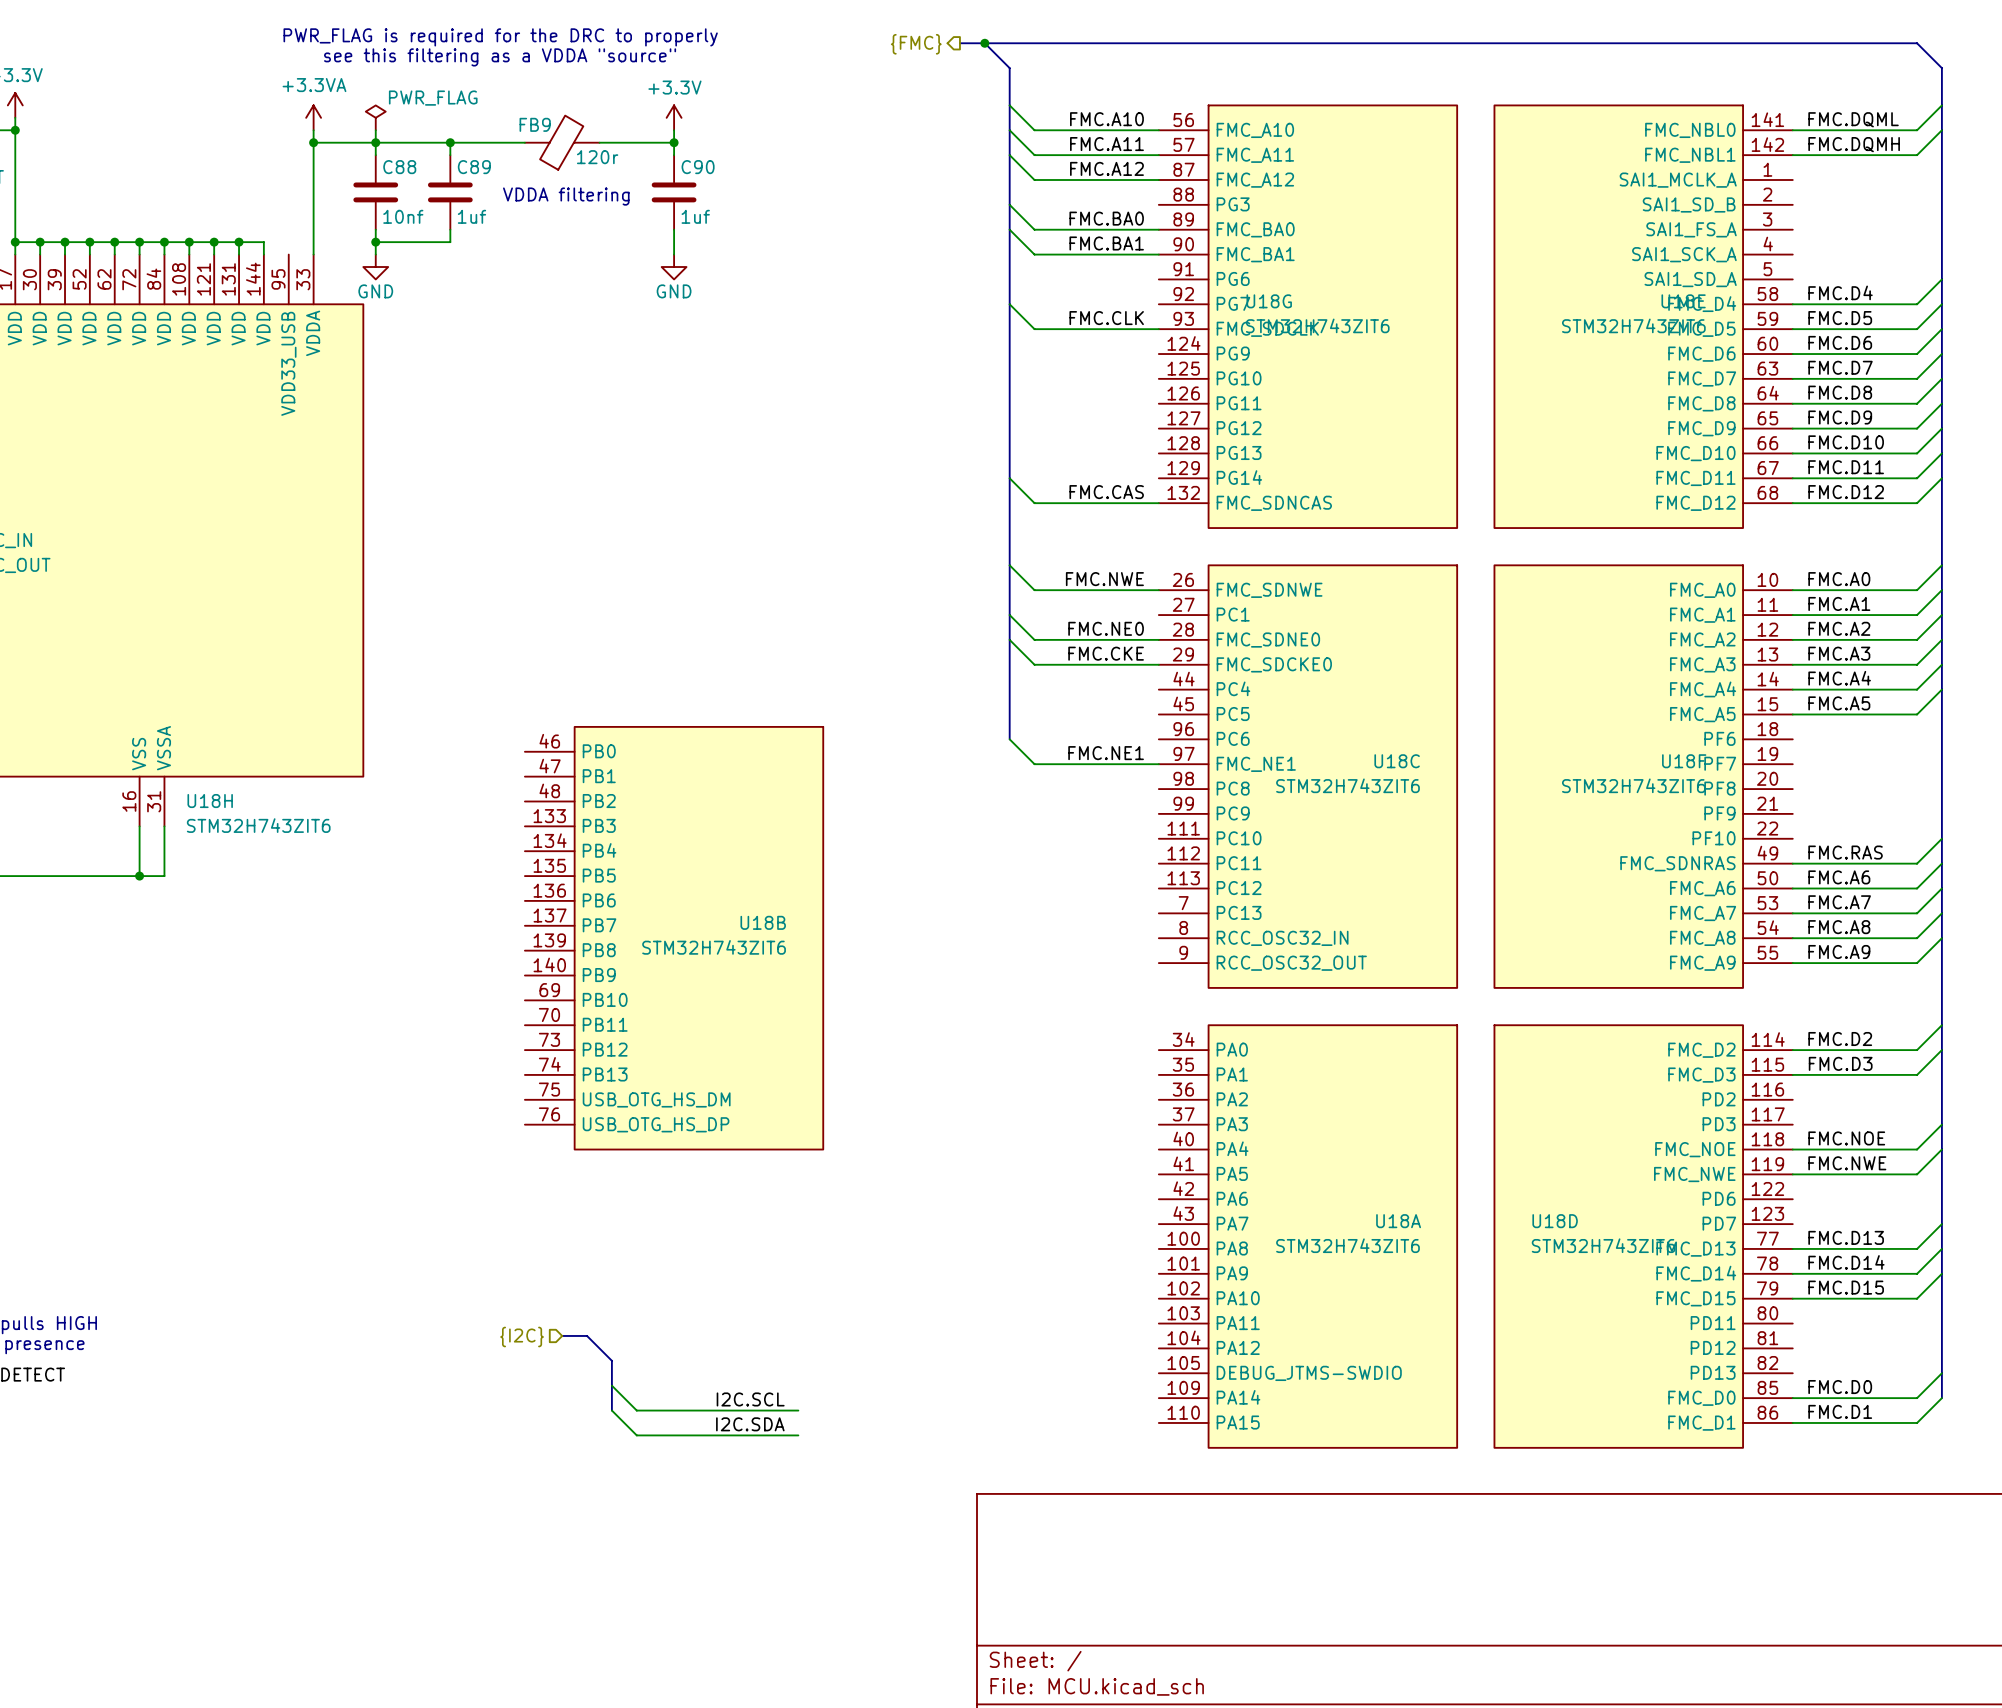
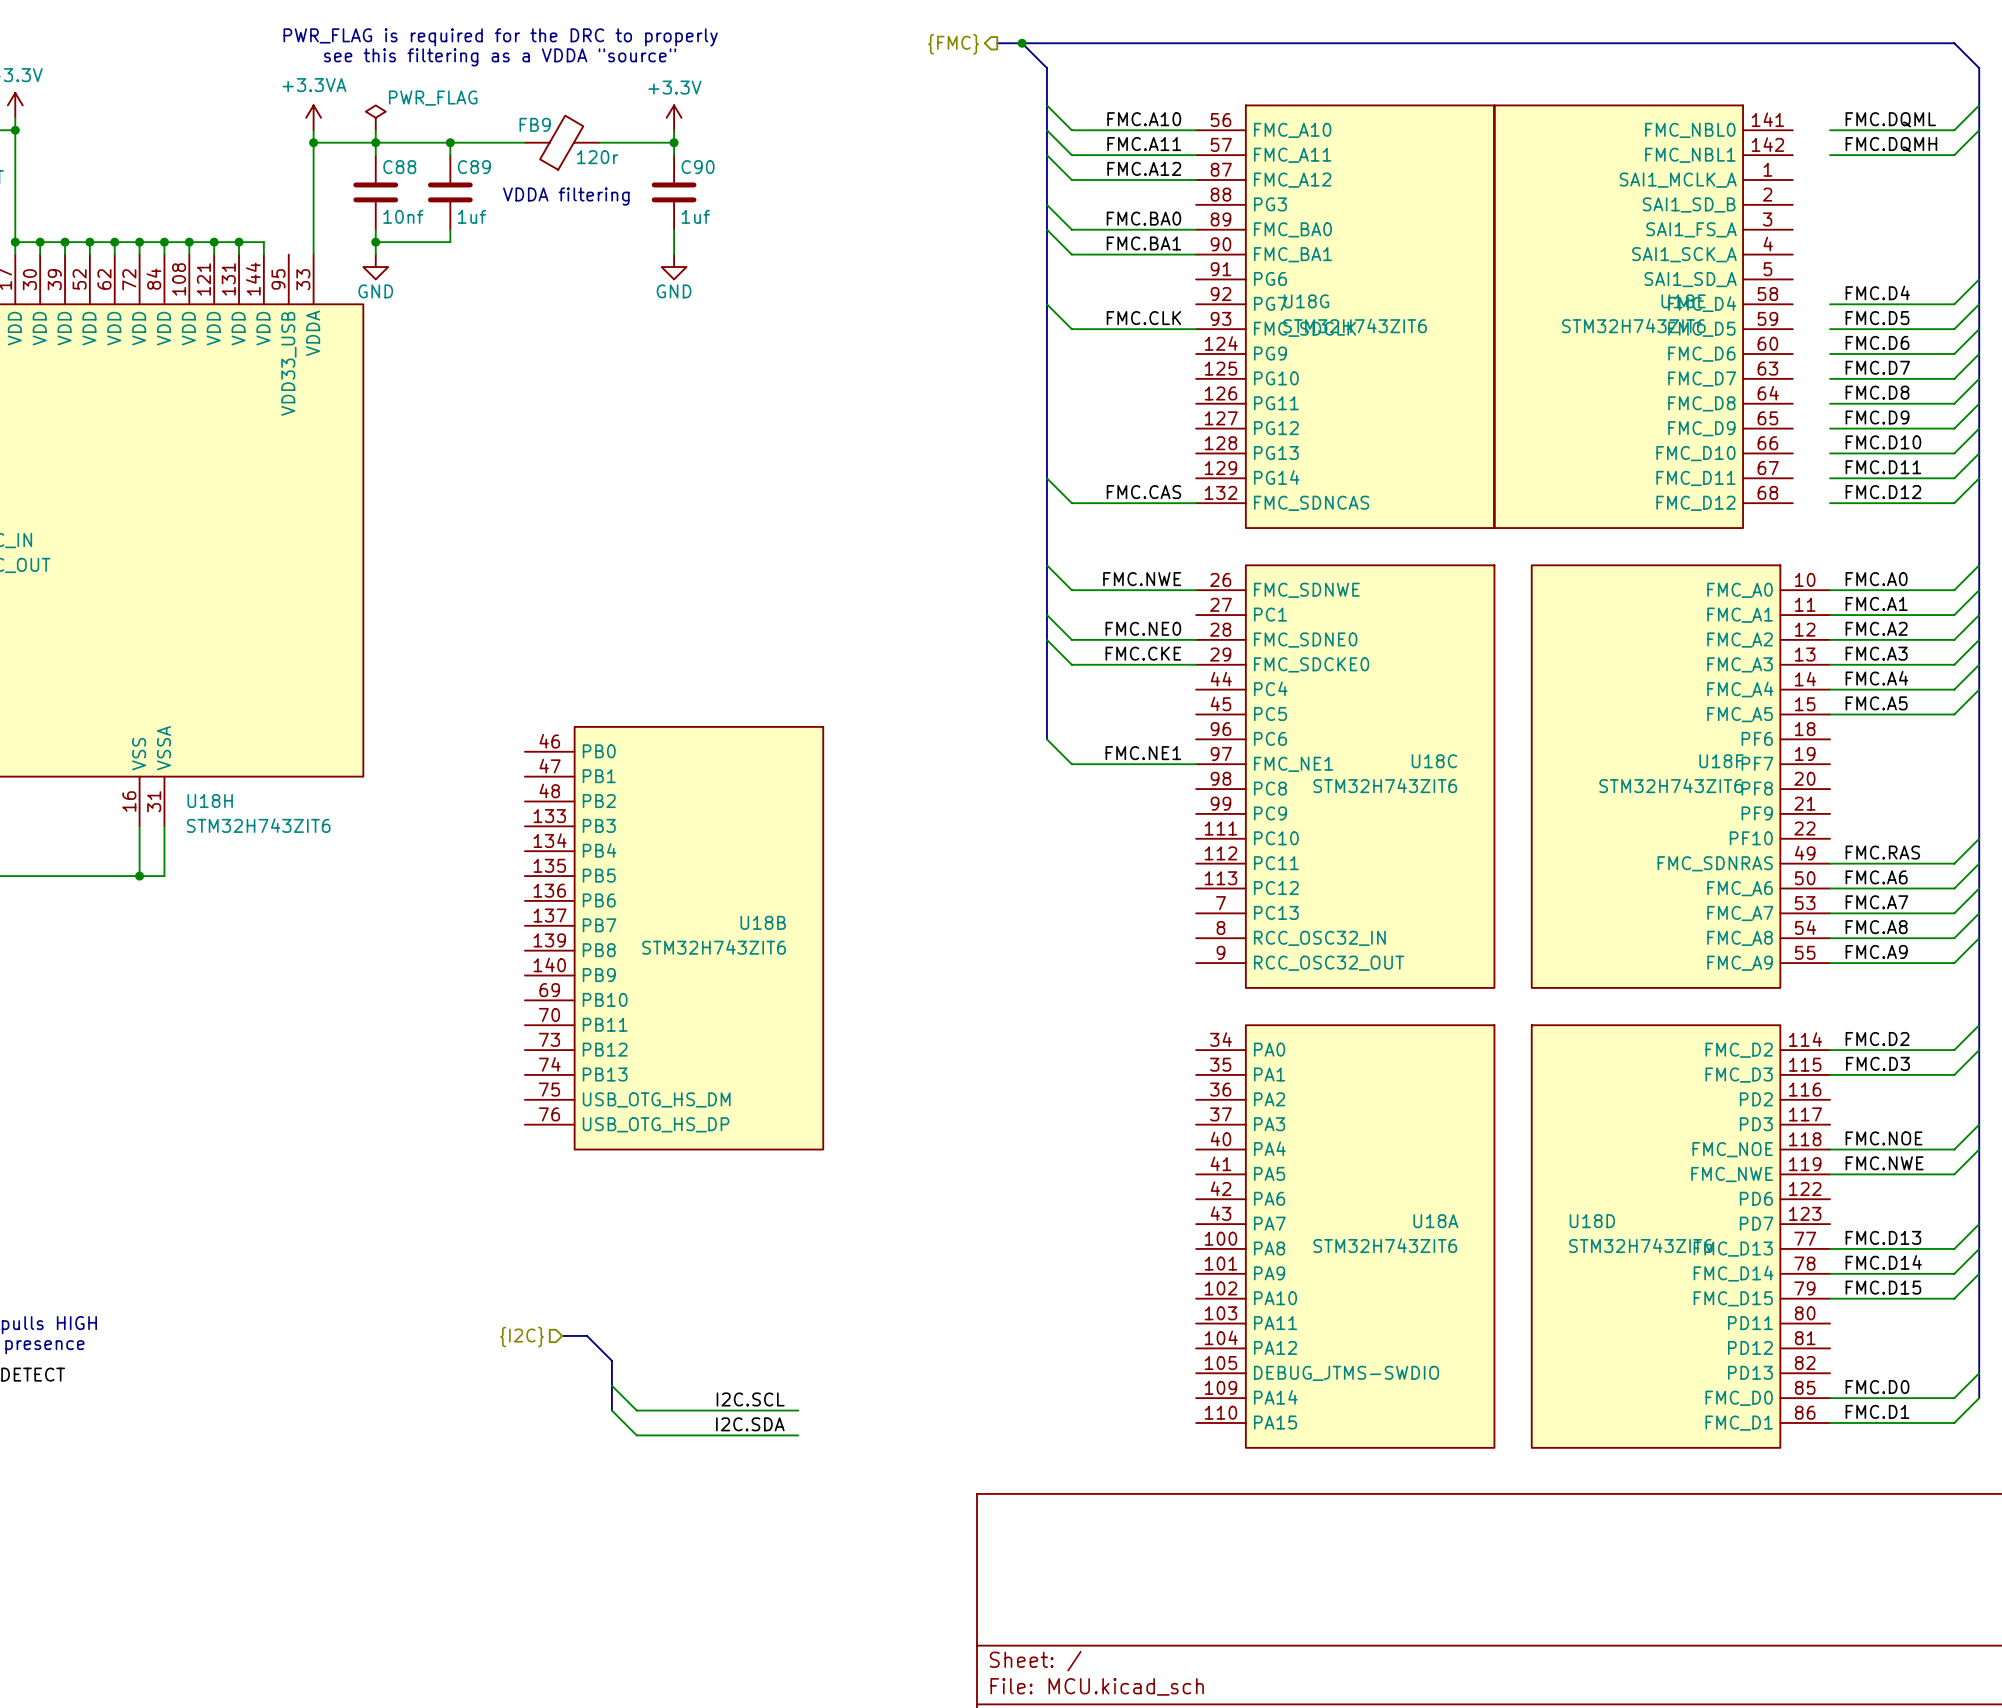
bus: (959, 43) (997, 43) -> none
bus: (984, 43) (1009, 68) (1009, 739) -> (1022, 43) (1046, 68) (1046, 739)
junction position: (984, 43) -> (1022, 43)
bus: (1917, 43) (1941, 68) (1941, 1398) -> (1917, 43) (1954, 43) (1979, 68) (1979, 1398)
hierarchical label position: {FMC} (916, 44) -> {FMC} (953, 44)
wire: (1009, 105) (1034, 130) (1071, 130) -> (1046, 105) (1071, 130)
wire: (1941, 105) (1917, 130) -> (1979, 105) (1954, 130) (1917, 130)
label position: FMC.A10 (1106, 119) -> FMC.A10 (1144, 119)
label position: FMC.DQML (1853, 119) -> FMC.DQML (1890, 119)
wire: (1009, 130) (1034, 155) (1071, 155) -> (1046, 130) (1071, 155)
wire: (1792, 130) (1830, 130) -> none
wire: (1941, 130) (1917, 155) -> (1979, 130) (1954, 155) (1917, 155)
label position: FMC.A11 (1106, 144) -> FMC.A11 (1144, 144)
label position: FMC.DQMH (1854, 144) -> FMC.DQMH (1891, 144)
wire: (1009, 155) (1034, 179) (1071, 179) -> (1046, 155) (1071, 179)
wire: (1792, 155) (1830, 155) -> none
label position: FMC.A12 (1106, 168) -> FMC.A12 (1144, 168)
wire: (1009, 204) (1034, 229) (1071, 229) -> (1046, 204) (1071, 229)
label position: FMC.BA0 (1106, 218) -> FMC.BA0 (1143, 218)
wire: (1009, 229) (1034, 254) (1071, 254) -> (1046, 229) (1071, 254)
label position: FMC.BA1 (1106, 243) -> FMC.BA1 (1143, 243)
wire: (1941, 279) (1917, 304) -> (1979, 279) (1954, 304) (1917, 304)
label position: FMC.D4 (1840, 292) -> FMC.D4 (1877, 292)
wire: (1009, 304) (1034, 329) (1071, 329) -> (1046, 304) (1071, 329)
wire: (1792, 304) (1830, 304) -> none
wire: (1941, 304) (1917, 329) -> (1979, 304) (1954, 329) (1917, 329)
U18G position: (1308, 316) -> (1345, 316)
label position: FMC.CLK (1106, 318) -> FMC.CLK (1143, 318)
label position: FMC.D5 (1840, 318) -> FMC.D5 (1877, 318)
wire: (1792, 329) (1830, 329) -> none
wire: (1941, 329) (1917, 354) -> (1979, 329) (1954, 354) (1917, 354)
label position: FMC.D6 (1840, 342) -> FMC.D6 (1877, 342)
wire: (1792, 354) (1830, 354) -> none
wire: (1941, 354) (1917, 378) -> (1979, 354) (1954, 378) (1917, 378)
label position: FMC.D7 (1840, 367) -> FMC.D7 (1877, 367)
wire: (1792, 378) (1830, 378) -> none
wire: (1941, 378) (1917, 403) -> (1979, 378) (1954, 403) (1917, 403)
label position: FMC.D8 (1840, 392) -> FMC.D8 (1877, 392)
wire: (1792, 403) (1830, 403) -> none
wire: (1941, 403) (1917, 428) -> (1979, 403) (1954, 428) (1917, 428)
label position: FMC.D9 (1840, 417) -> FMC.D9 (1877, 417)
wire: (1792, 428) (1830, 428) -> none
wire: (1941, 428) (1917, 453) -> (1979, 428) (1954, 453) (1917, 453)
label position: FMC.D10 (1846, 442) -> FMC.D10 (1883, 442)
wire: (1792, 453) (1830, 453) -> none
wire: (1941, 453) (1917, 478) -> (1979, 453) (1954, 478) (1917, 478)
label position: FMC.D11 (1846, 467) -> FMC.D11 (1883, 467)
wire: (1009, 478) (1034, 503) (1071, 503) -> (1046, 478) (1071, 503)
wire: (1792, 478) (1830, 478) -> none
wire: (1941, 478) (1917, 503) -> (1979, 478) (1954, 503) (1917, 503)
label position: FMC.CAS (1106, 492) -> FMC.CAS (1143, 492)
label position: FMC.D12 (1846, 492) -> FMC.D12 (1883, 492)
wire: (1792, 503) (1830, 503) -> none
wire: (1009, 565) (1034, 590) (1071, 590) -> (1046, 565) (1071, 590)
wire: (1941, 565) (1917, 590) -> (1979, 565) (1954, 590) (1917, 590)
label position: FMC.NWE (1104, 579) -> FMC.NWE (1142, 579)
label position: FMC.A0 (1839, 579) -> FMC.A0 (1876, 579)
wire: (1941, 590) (1917, 615) -> (1979, 590) (1954, 615) (1917, 615)
label position: FMC.A1 (1839, 603) -> FMC.A1 (1876, 603)
wire: (1009, 615) (1034, 639) (1071, 639) -> (1046, 615) (1071, 639)
wire: (1941, 615) (1917, 639) -> (1979, 615) (1954, 639) (1917, 639)
label position: FMC.NE0 (1106, 628) -> FMC.NE0 (1143, 628)
label position: FMC.A2 (1839, 628) -> FMC.A2 (1876, 628)
wire: (1009, 639) (1034, 664) (1071, 664) -> (1046, 639) (1071, 664)
wire: (1941, 639) (1917, 664) -> (1979, 639) (1954, 664) (1917, 664)
label position: FMC.CKE (1106, 653) -> FMC.CKE (1143, 653)
label position: FMC.A3 (1839, 653) -> FMC.A3 (1876, 653)
wire: (1941, 664) (1917, 689) -> (1979, 664) (1954, 689) (1917, 689)
label position: FMC.A4 (1839, 678) -> FMC.A4 (1876, 678)
wire: (1941, 689) (1917, 714) -> (1979, 689) (1954, 714) (1917, 714)
label position: FMC.A5 (1839, 703) -> FMC.A5 (1876, 703)
wire: (1009, 739) (1034, 764) (1071, 764) -> (1046, 739) (1071, 764)
label position: FMC.NE1 (1106, 753) -> FMC.NE1 (1143, 753)
U18C position: (1308, 776) -> (1345, 776)
U18F position: (1643, 776) -> (1680, 776)
wire: (1941, 838) (1917, 863) -> (1979, 838) (1954, 863) (1917, 863)
label position: FMC.RAS (1845, 852) -> FMC.RAS (1882, 852)
wire: (1941, 863) (1917, 888) -> (1979, 863) (1954, 888) (1917, 888)
label position: FMC.A6 (1839, 877) -> FMC.A6 (1876, 877)
wire: (1941, 888) (1917, 913) -> (1979, 888) (1954, 913) (1917, 913)
label position: FMC.A7 (1839, 902) -> FMC.A7 (1876, 902)
wire: (1941, 913) (1917, 938) -> (1979, 913) (1954, 938) (1917, 938)
label position: FMC.A8 (1839, 927) -> FMC.A8 (1876, 927)
wire: (1941, 938) (1917, 963) -> (1979, 938) (1954, 963) (1917, 963)
label position: FMC.A9 (1839, 951) -> FMC.A9 (1876, 951)
wire: (1941, 1025) (1917, 1050) -> (1979, 1025) (1954, 1050) (1917, 1050)
label position: FMC.D2 (1840, 1039) -> FMC.D2 (1877, 1039)
wire: (1941, 1050) (1917, 1074) -> (1979, 1050) (1954, 1074) (1917, 1074)
label position: FMC.D3 (1840, 1063) -> FMC.D3 (1877, 1063)
wire: (1941, 1124) (1917, 1149) -> (1979, 1124) (1954, 1149) (1917, 1149)
label position: FMC.NOE (1846, 1138) -> FMC.NOE (1884, 1138)
wire: (1941, 1149) (1917, 1174) -> (1979, 1149) (1954, 1174) (1917, 1174)
label position: FMC.NWE (1847, 1163) -> FMC.NWE (1884, 1163)
wire: (1941, 1224) (1917, 1248) -> (1979, 1224) (1954, 1248) (1917, 1248)
U18A position: (1308, 1236) -> (1345, 1236)
U18D position: (1643, 1236) -> (1680, 1236)
label position: FMC.D13 (1846, 1237) -> FMC.D13 (1883, 1237)
wire: (1941, 1248) (1917, 1273) -> (1979, 1248) (1954, 1273) (1917, 1273)
label position: FMC.D14 (1846, 1262) -> FMC.D14 (1883, 1262)
wire: (1941, 1273) (1917, 1298) -> (1979, 1273) (1954, 1298) (1917, 1298)
label position: FMC.D15 (1846, 1287) -> FMC.D15 (1883, 1287)
wire: (1941, 1373) (1917, 1398) -> (1979, 1373) (1954, 1398) (1917, 1398)
label position: FMC.D0 (1840, 1387) -> FMC.D0 (1877, 1387)
wire: (1941, 1398) (1917, 1422) -> (1979, 1398) (1954, 1422) (1917, 1422)
label position: FMC.D1 (1840, 1411) -> FMC.D1 (1877, 1411)

